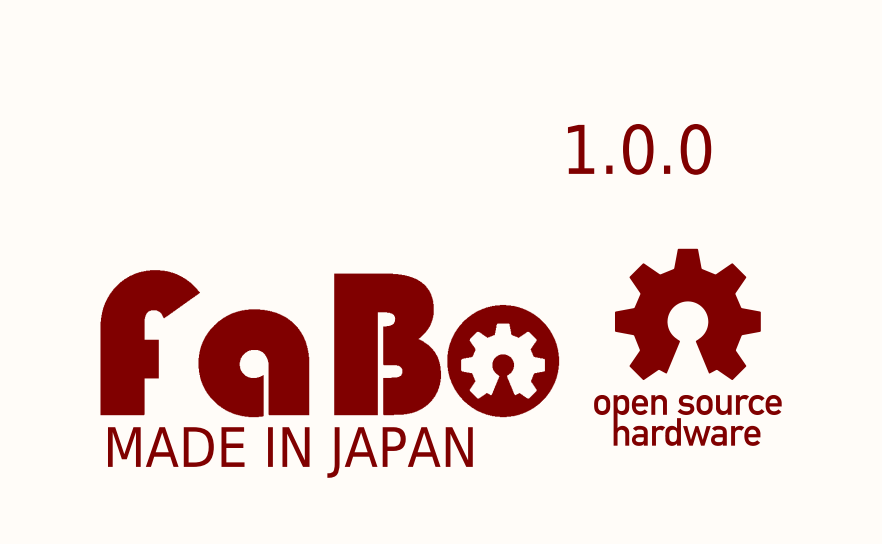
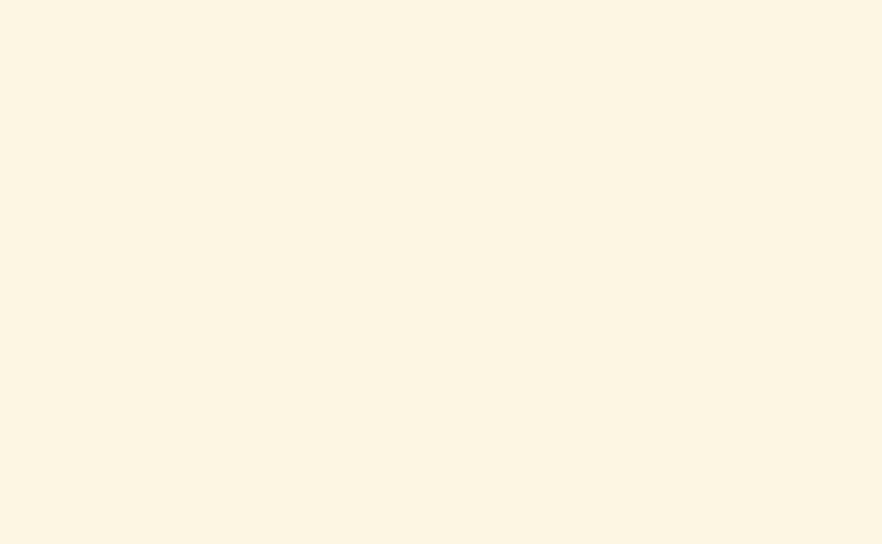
text: 1.0.0 (639, 149) -> none
part: (329, 343) -> none
part: (687, 347) -> none

